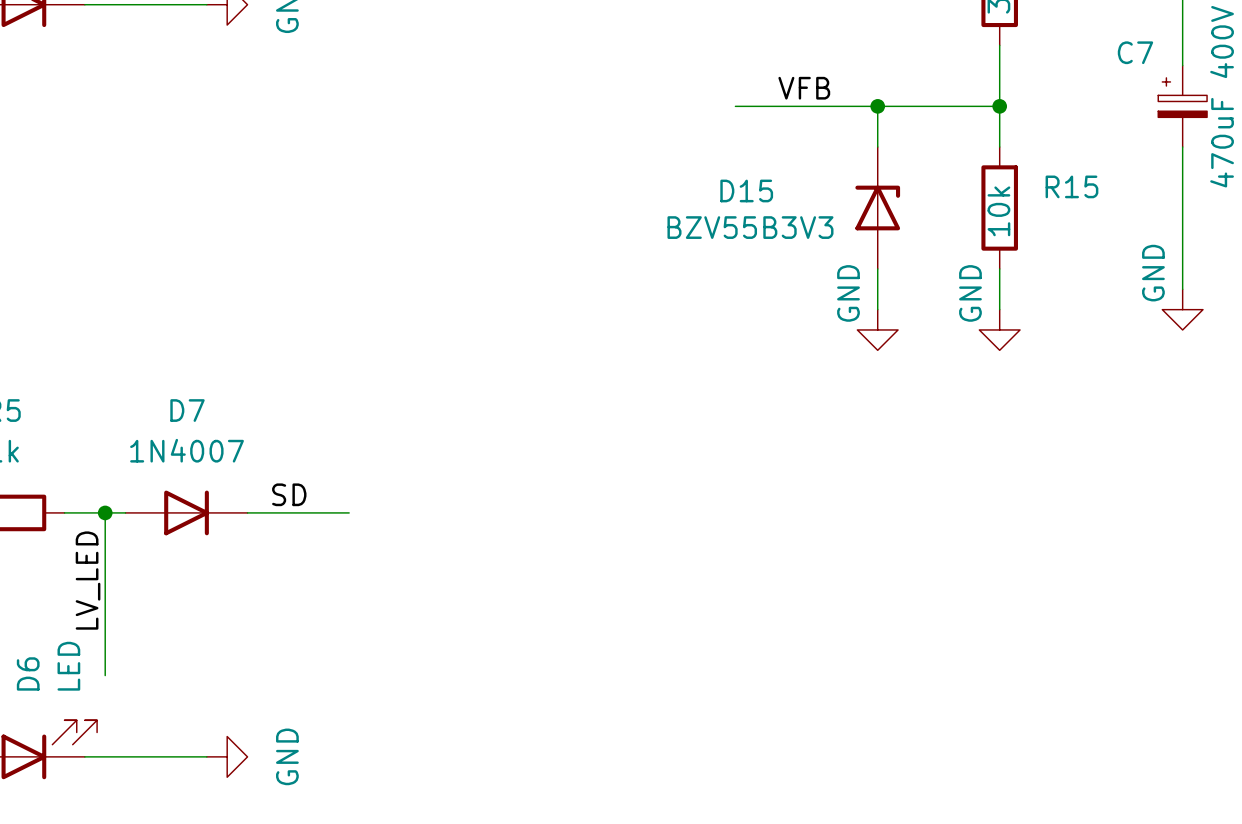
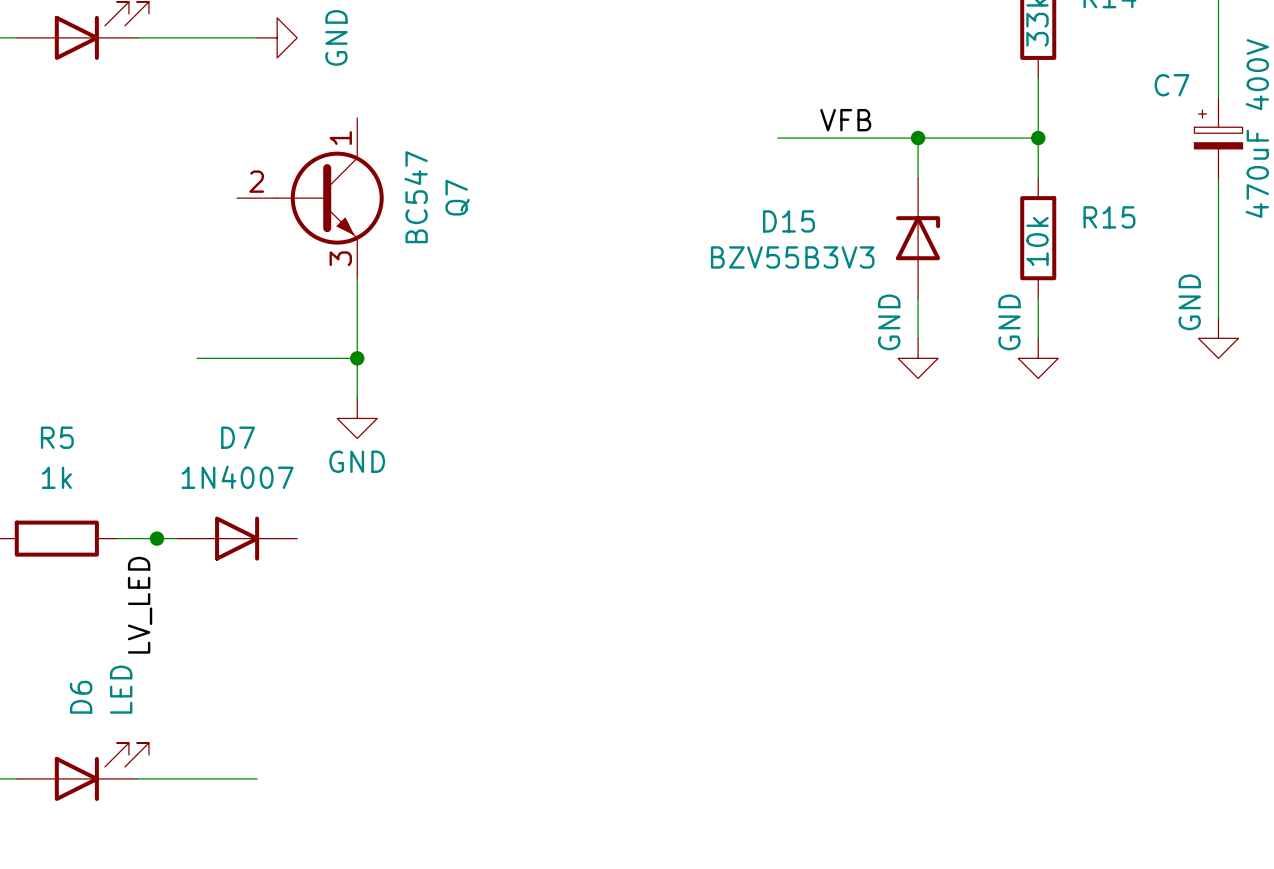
Q7: none -> BC547 (310, 198)
wire: none -> (357, 278) (357, 398)
wire: none -> (197, 358) (357, 358)
junction: none -> (357, 358)
power symbol: none -> GND (357, 418)
label: SD (289, 494) -> none
wire: (105, 512) (105, 675) -> none
wire: (247, 512) (349, 512) -> none
power symbol: GND (227, 756) -> none

